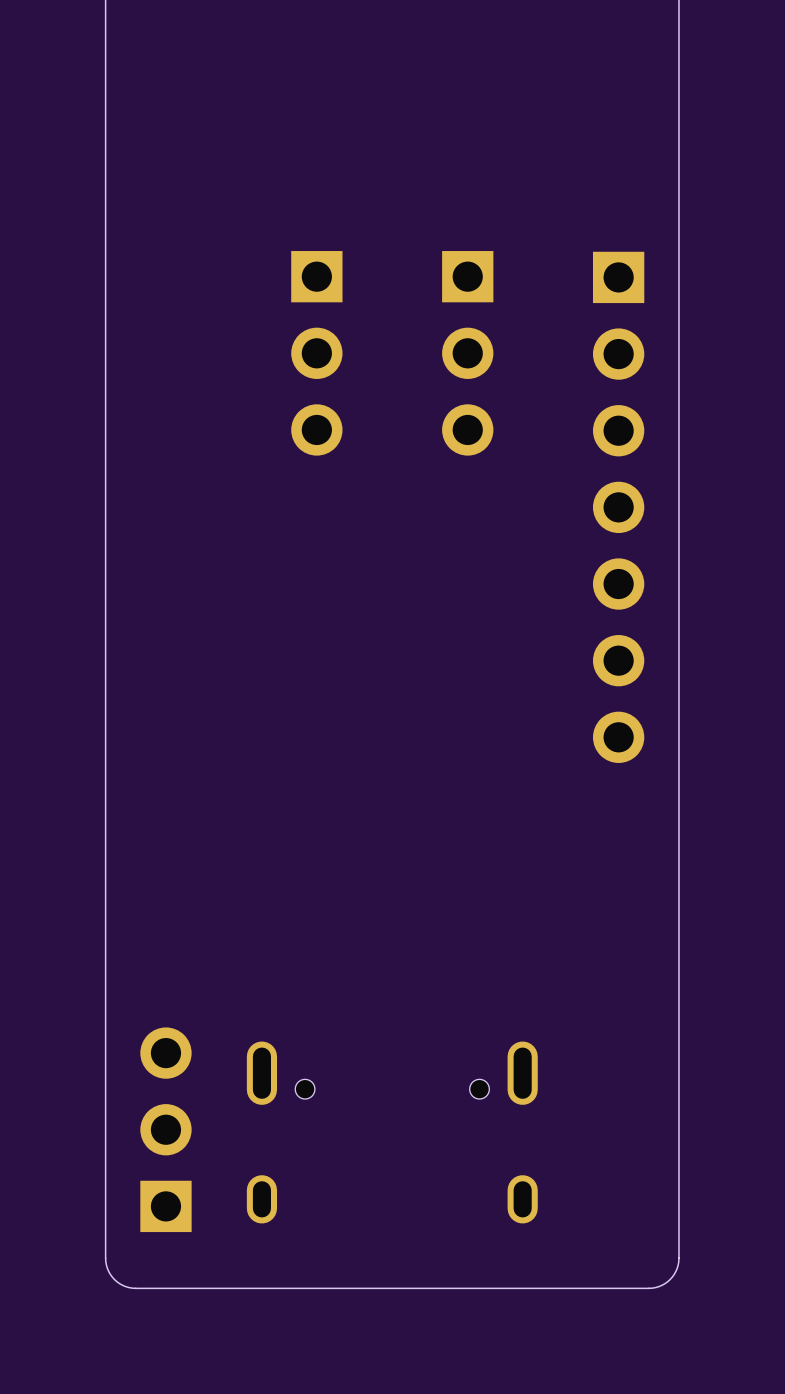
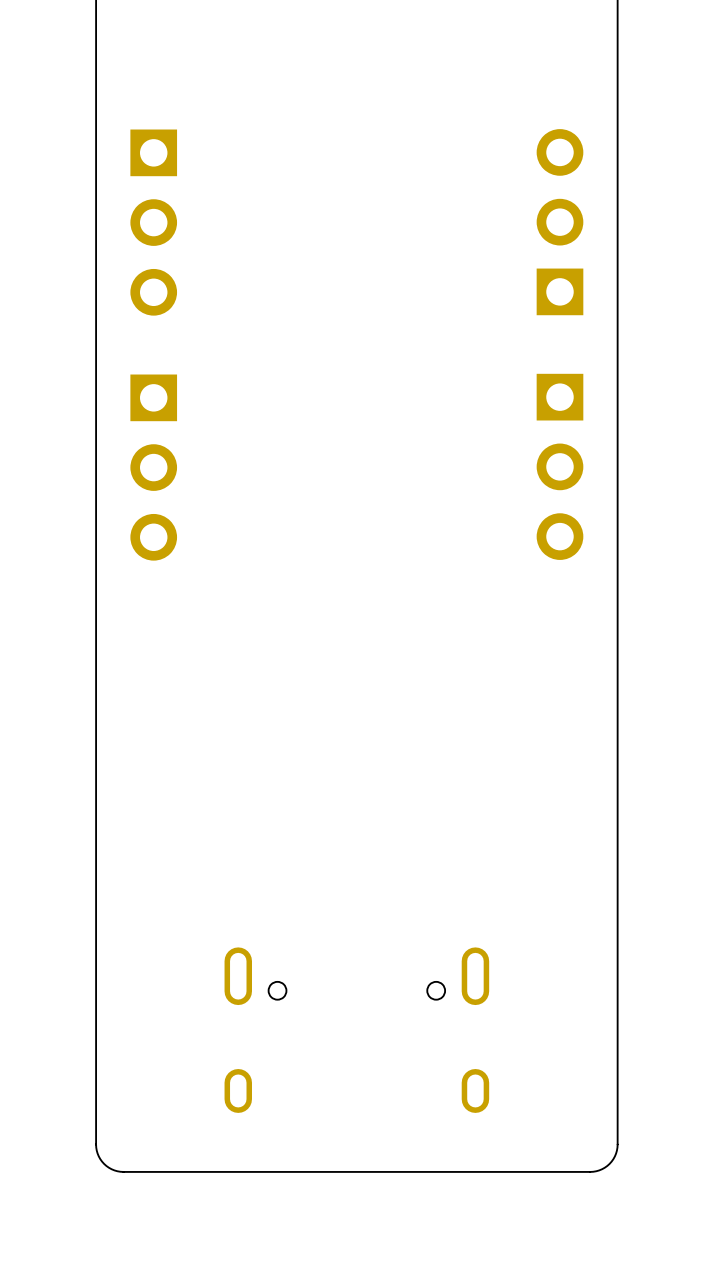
part: none -> (153, 222)
part: none -> (559, 222)
part footprint: [592, 251, 645, 763] -> [536, 373, 584, 560]
part: (316, 353) -> none
part: (467, 353) -> none
part: none -> (153, 467)
part: (165, 1129) -> none

